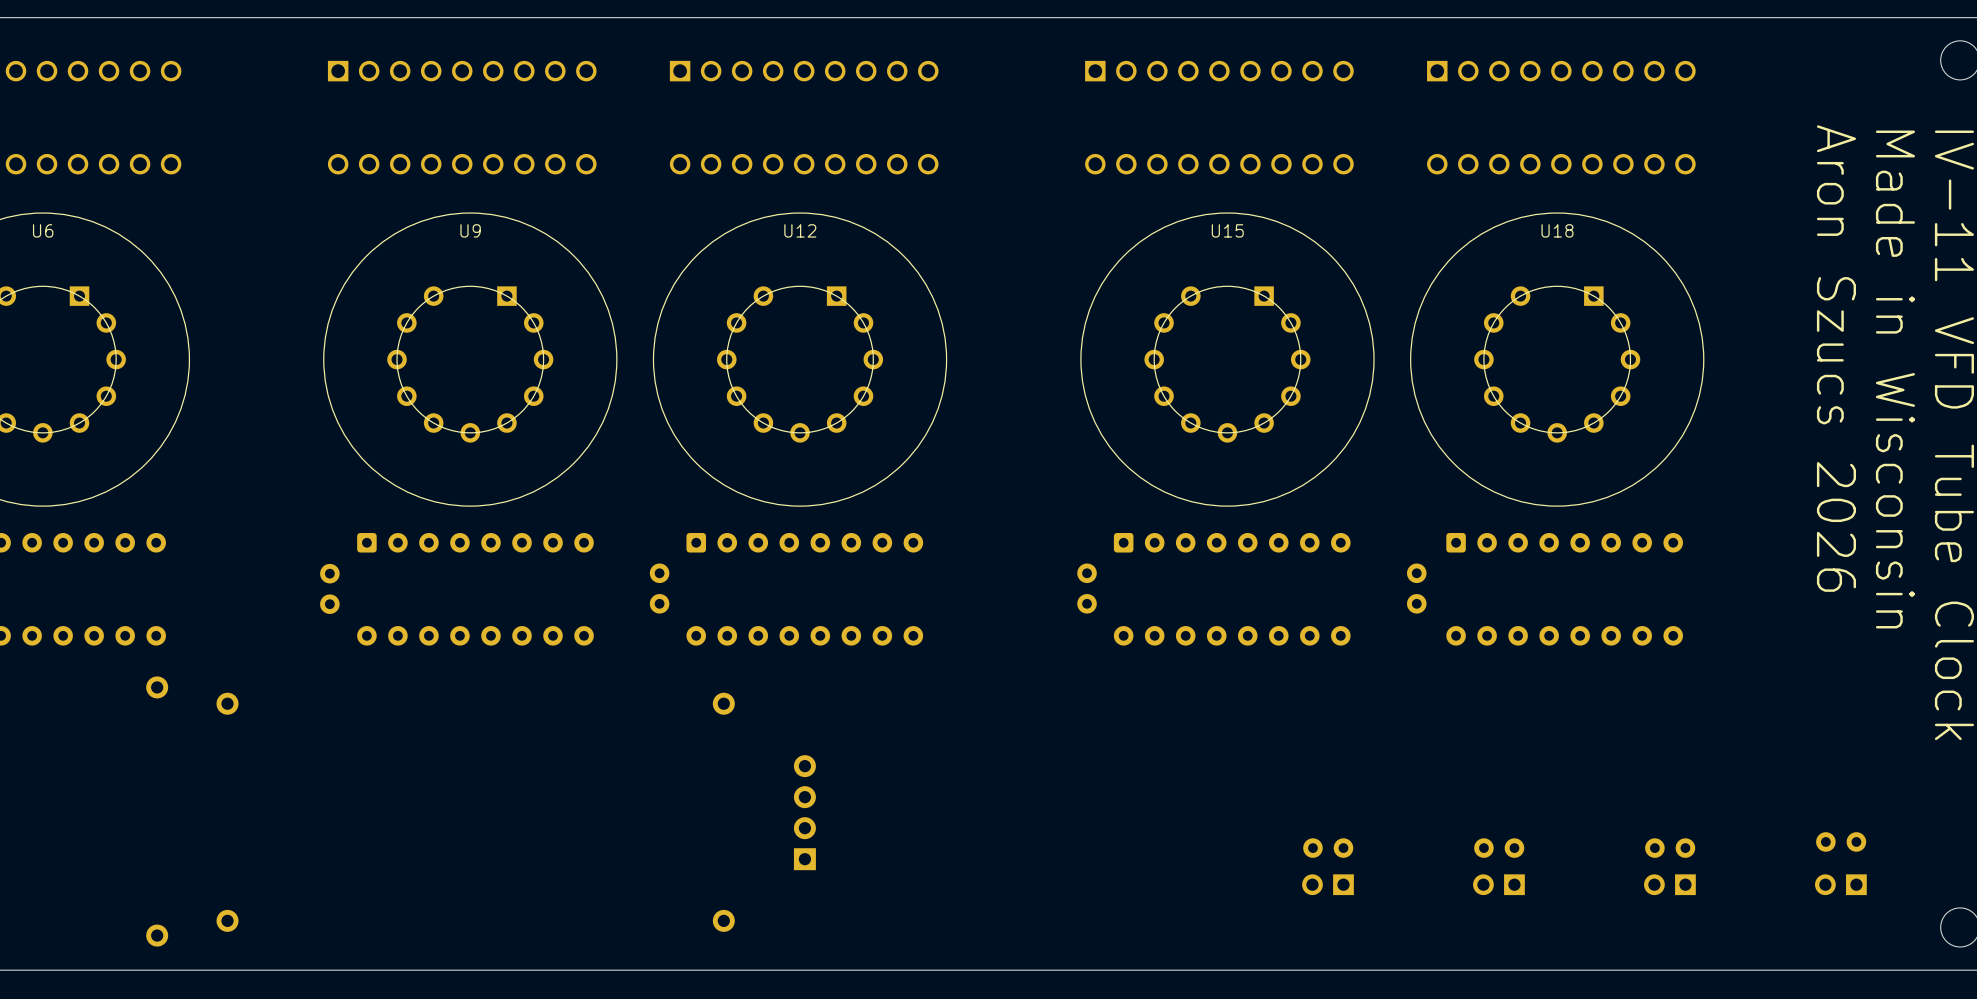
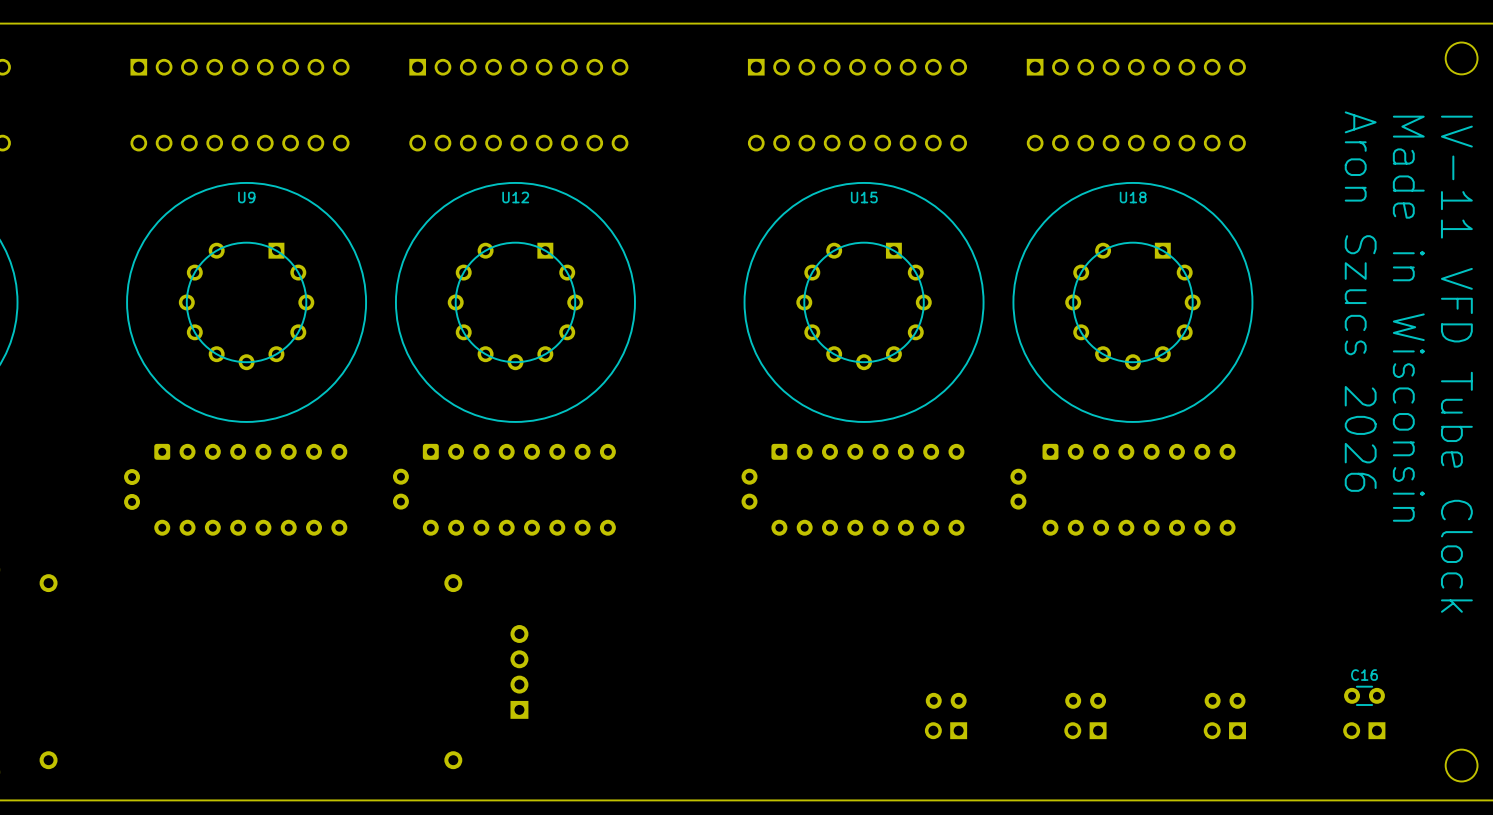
C16 side: bottom (1841, 841) -> top (1364, 695)

